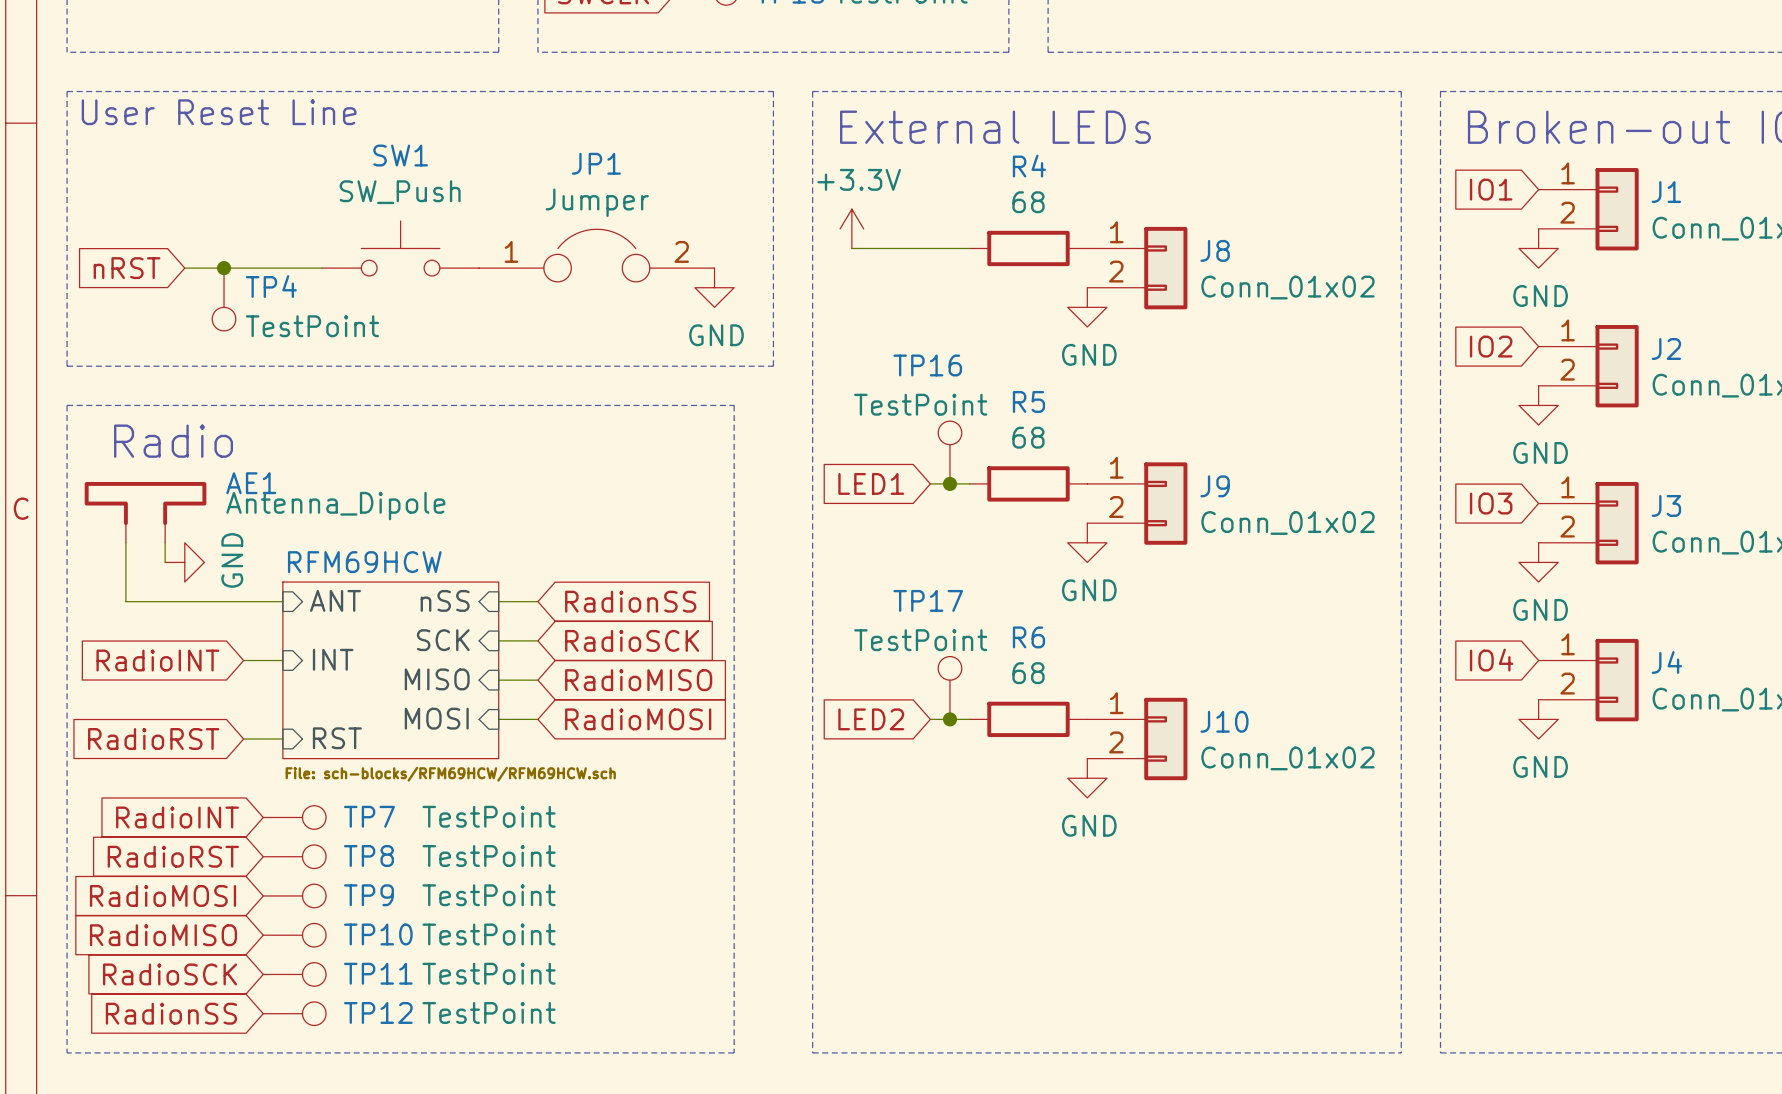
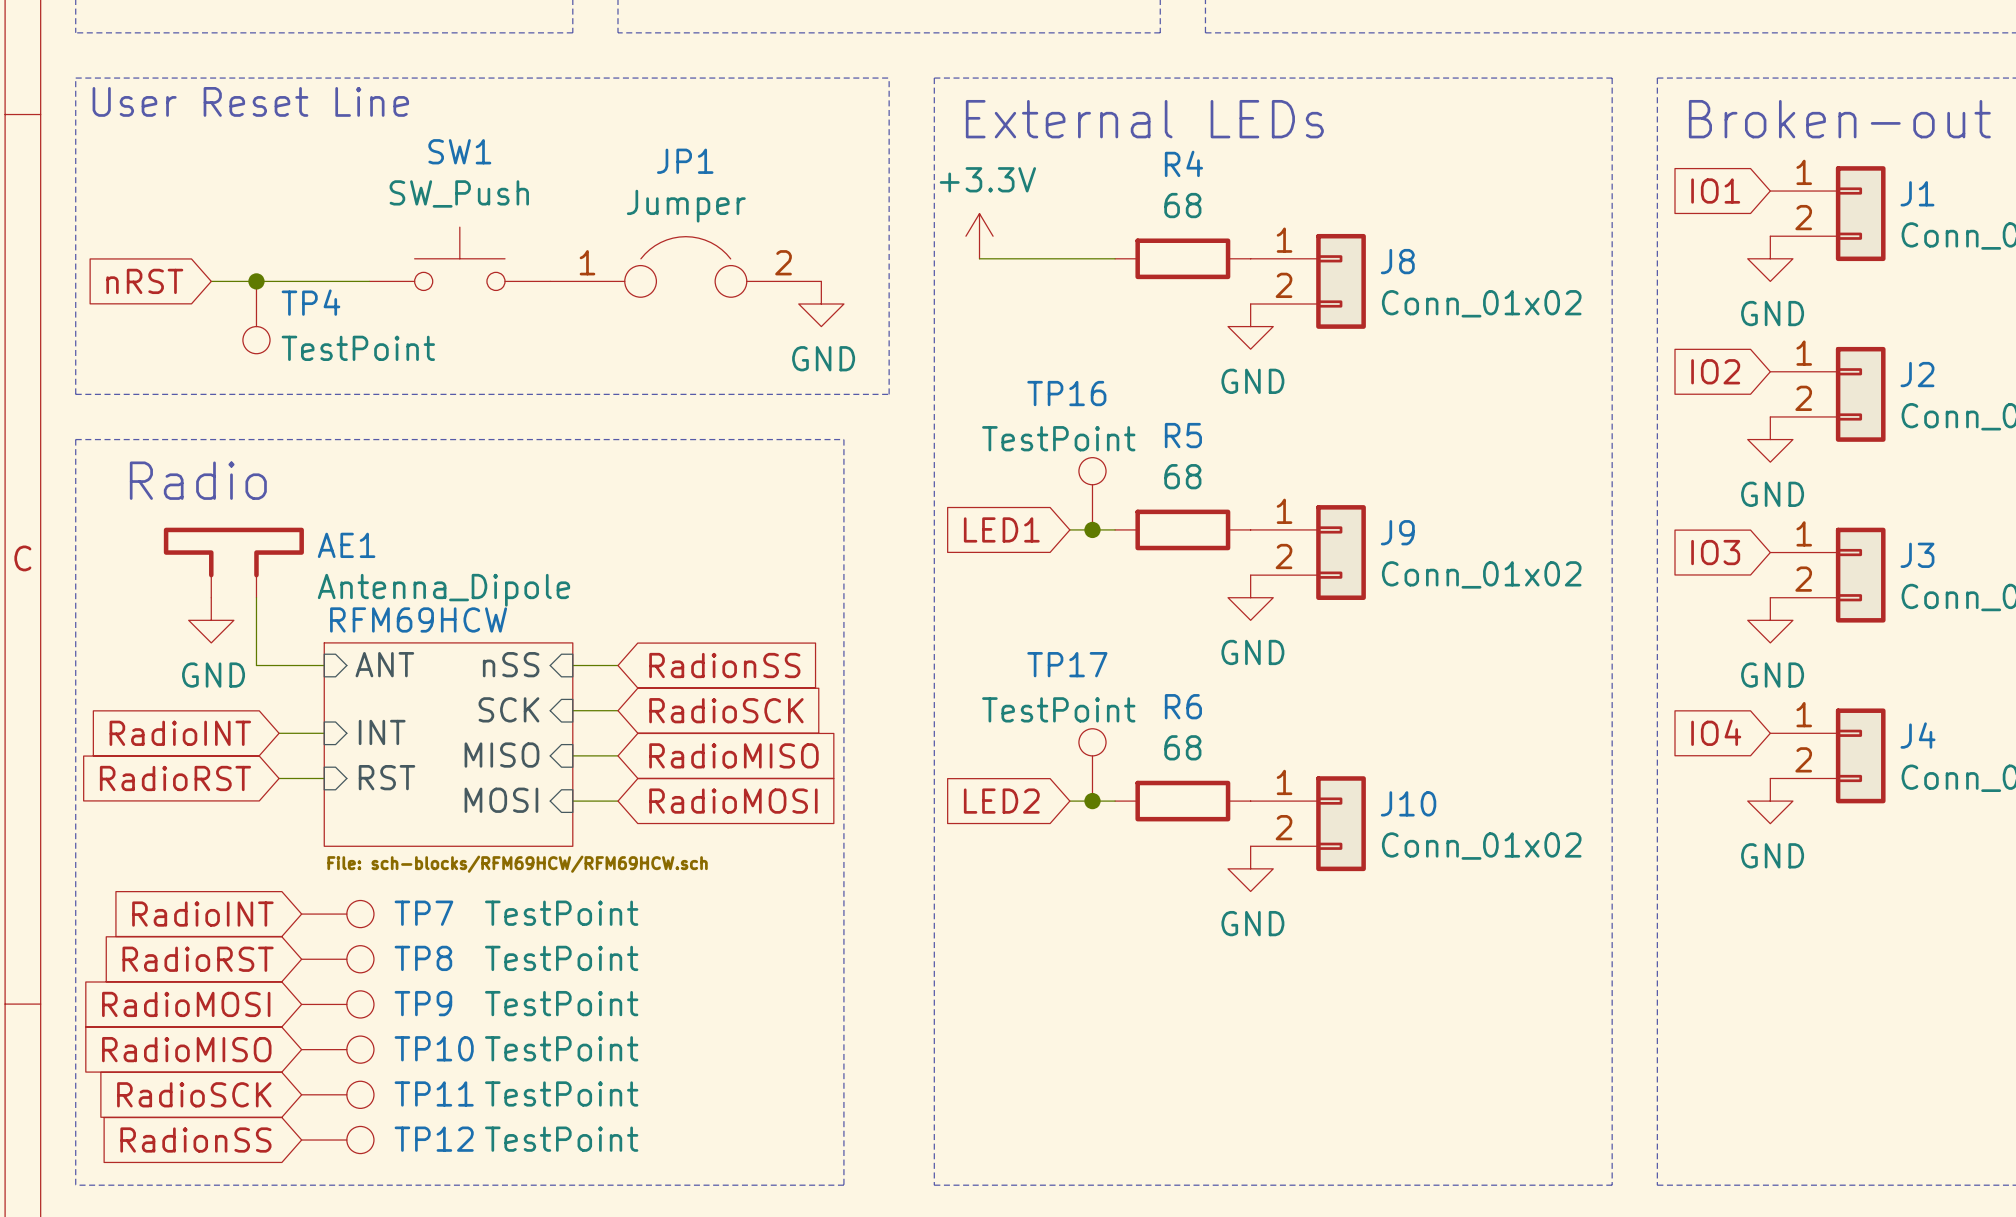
AE1 name position: AE1 (251, 483) -> AE1 (346, 545)
AE1 value position: Antenna_Dipole (335, 506) -> Antenna_Dipole (443, 590)
AE1 position: (145, 512) -> (233, 562)
wire: (125, 542) (125, 601) (224, 601) -> (256, 597) (256, 665)
wire: (165, 542) (165, 562) -> none
power symbol rotation: 0° (184, 562) -> 90° clockwise (211, 620)
sheet pin position: RST (337, 738) -> RST (387, 777)
global label position: RadioRST (153, 739) -> RadioRST (175, 778)
wire: (243, 739) (282, 739) -> (279, 778) (324, 778)

